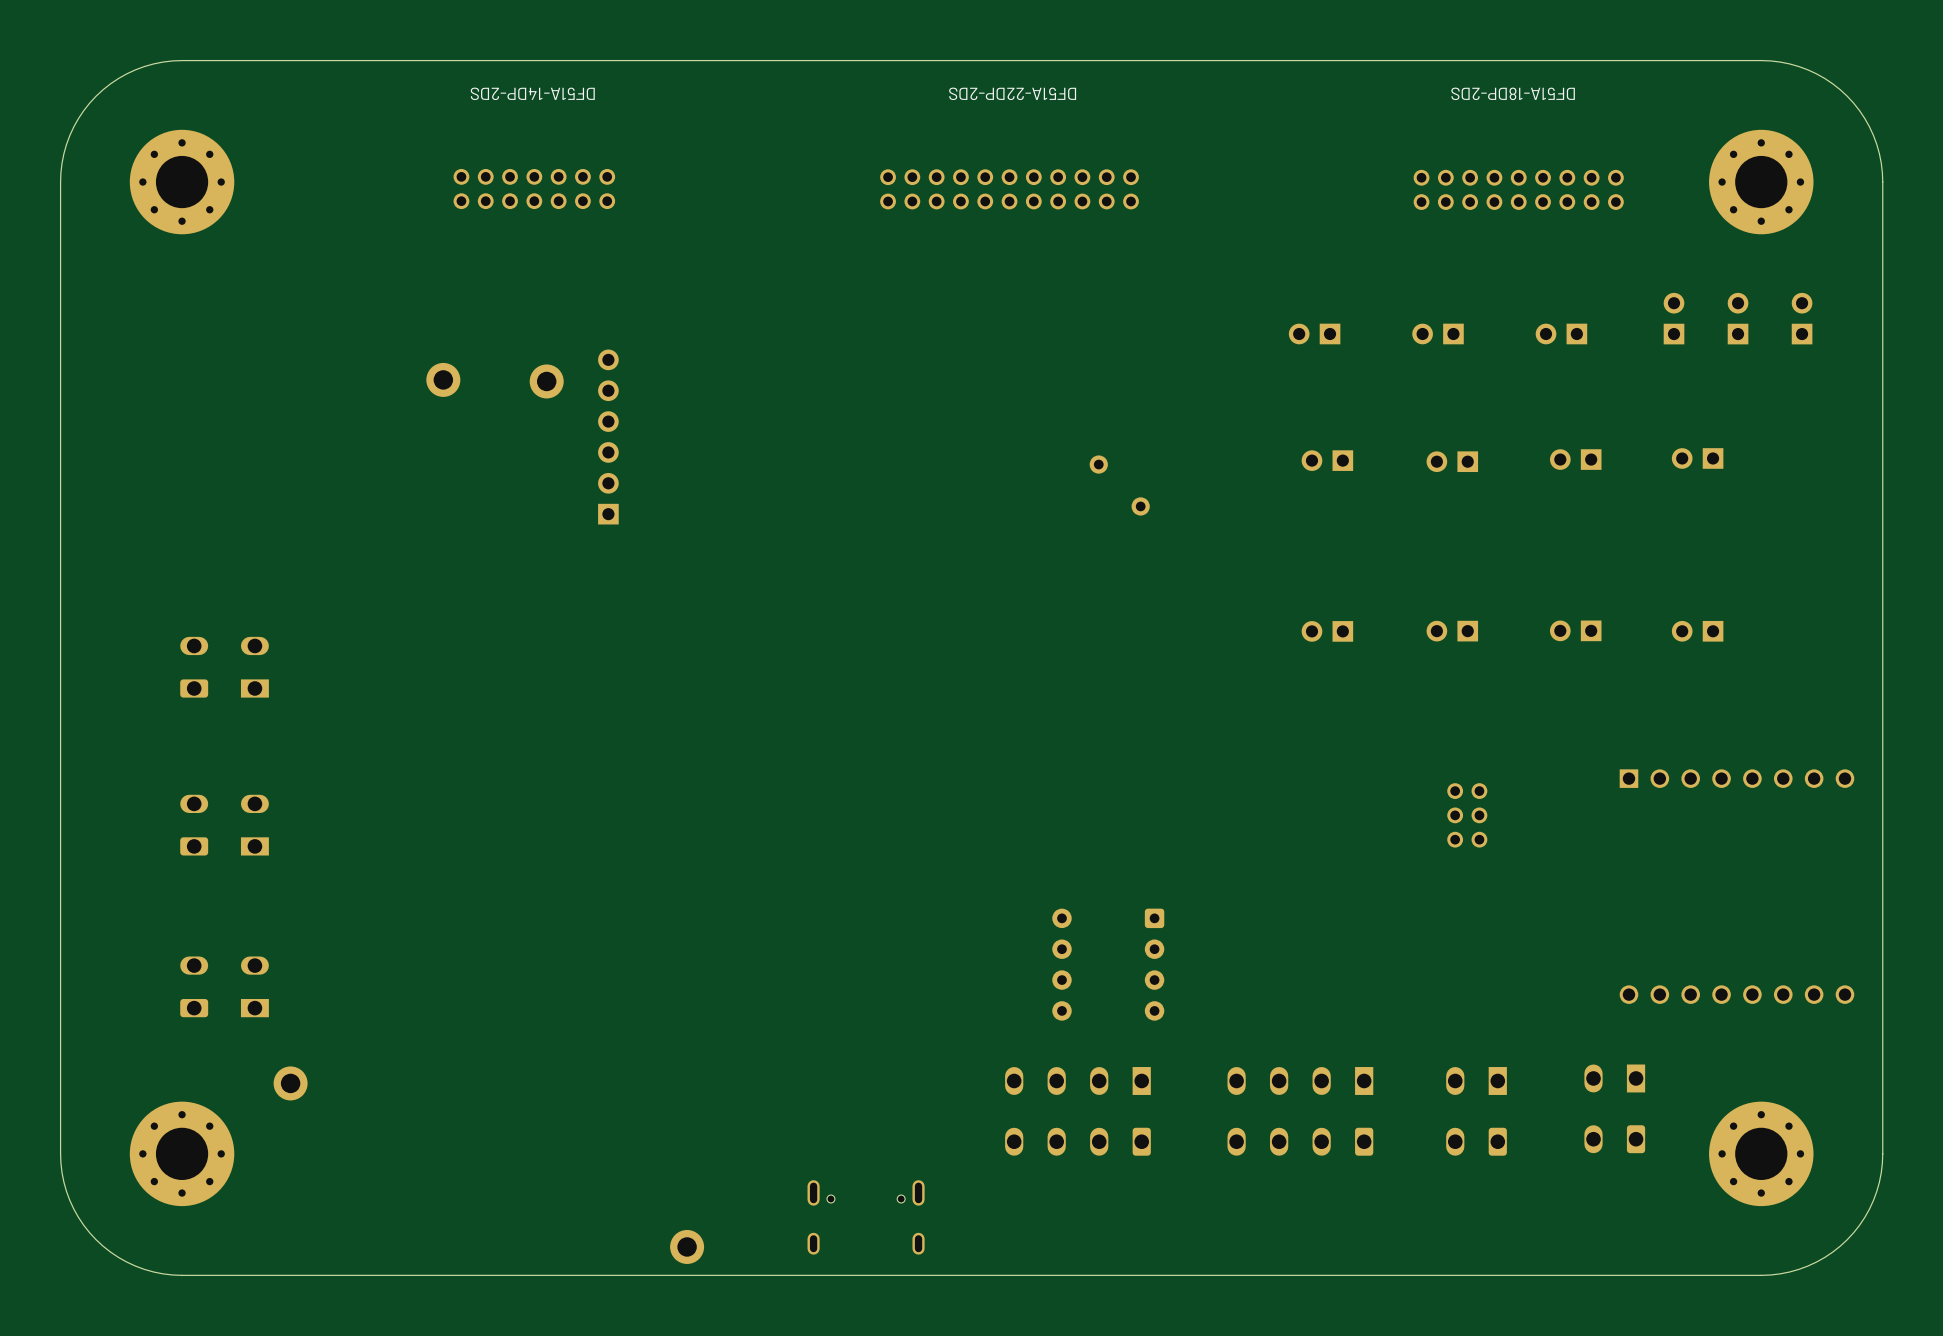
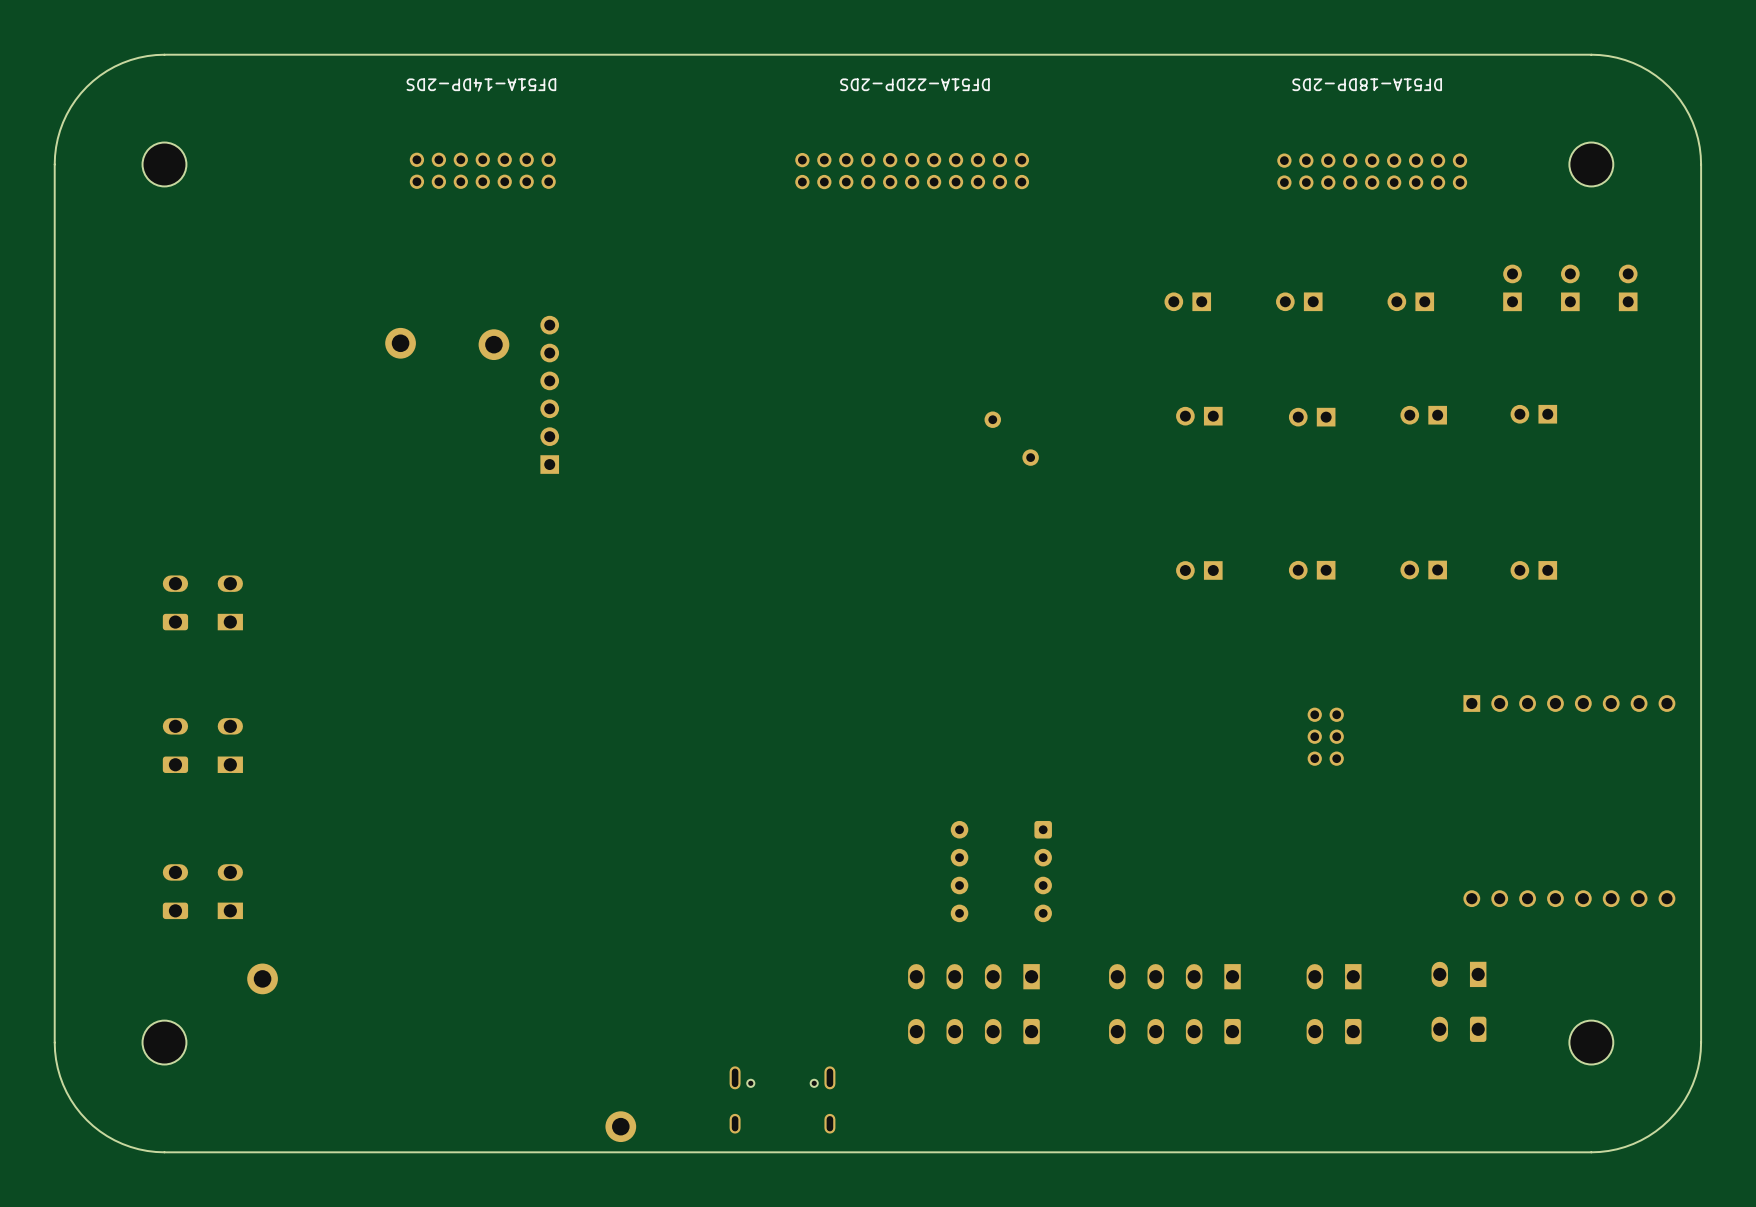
part footprint: [129, 129, 235, 235] -> [142, 142, 187, 187]
part footprint: [1709, 129, 1814, 235] -> [1569, 142, 1614, 187]
part footprint: [129, 1101, 235, 1207] -> [142, 1020, 187, 1065]
part footprint: [1709, 1101, 1814, 1207] -> [1569, 1020, 1614, 1065]

